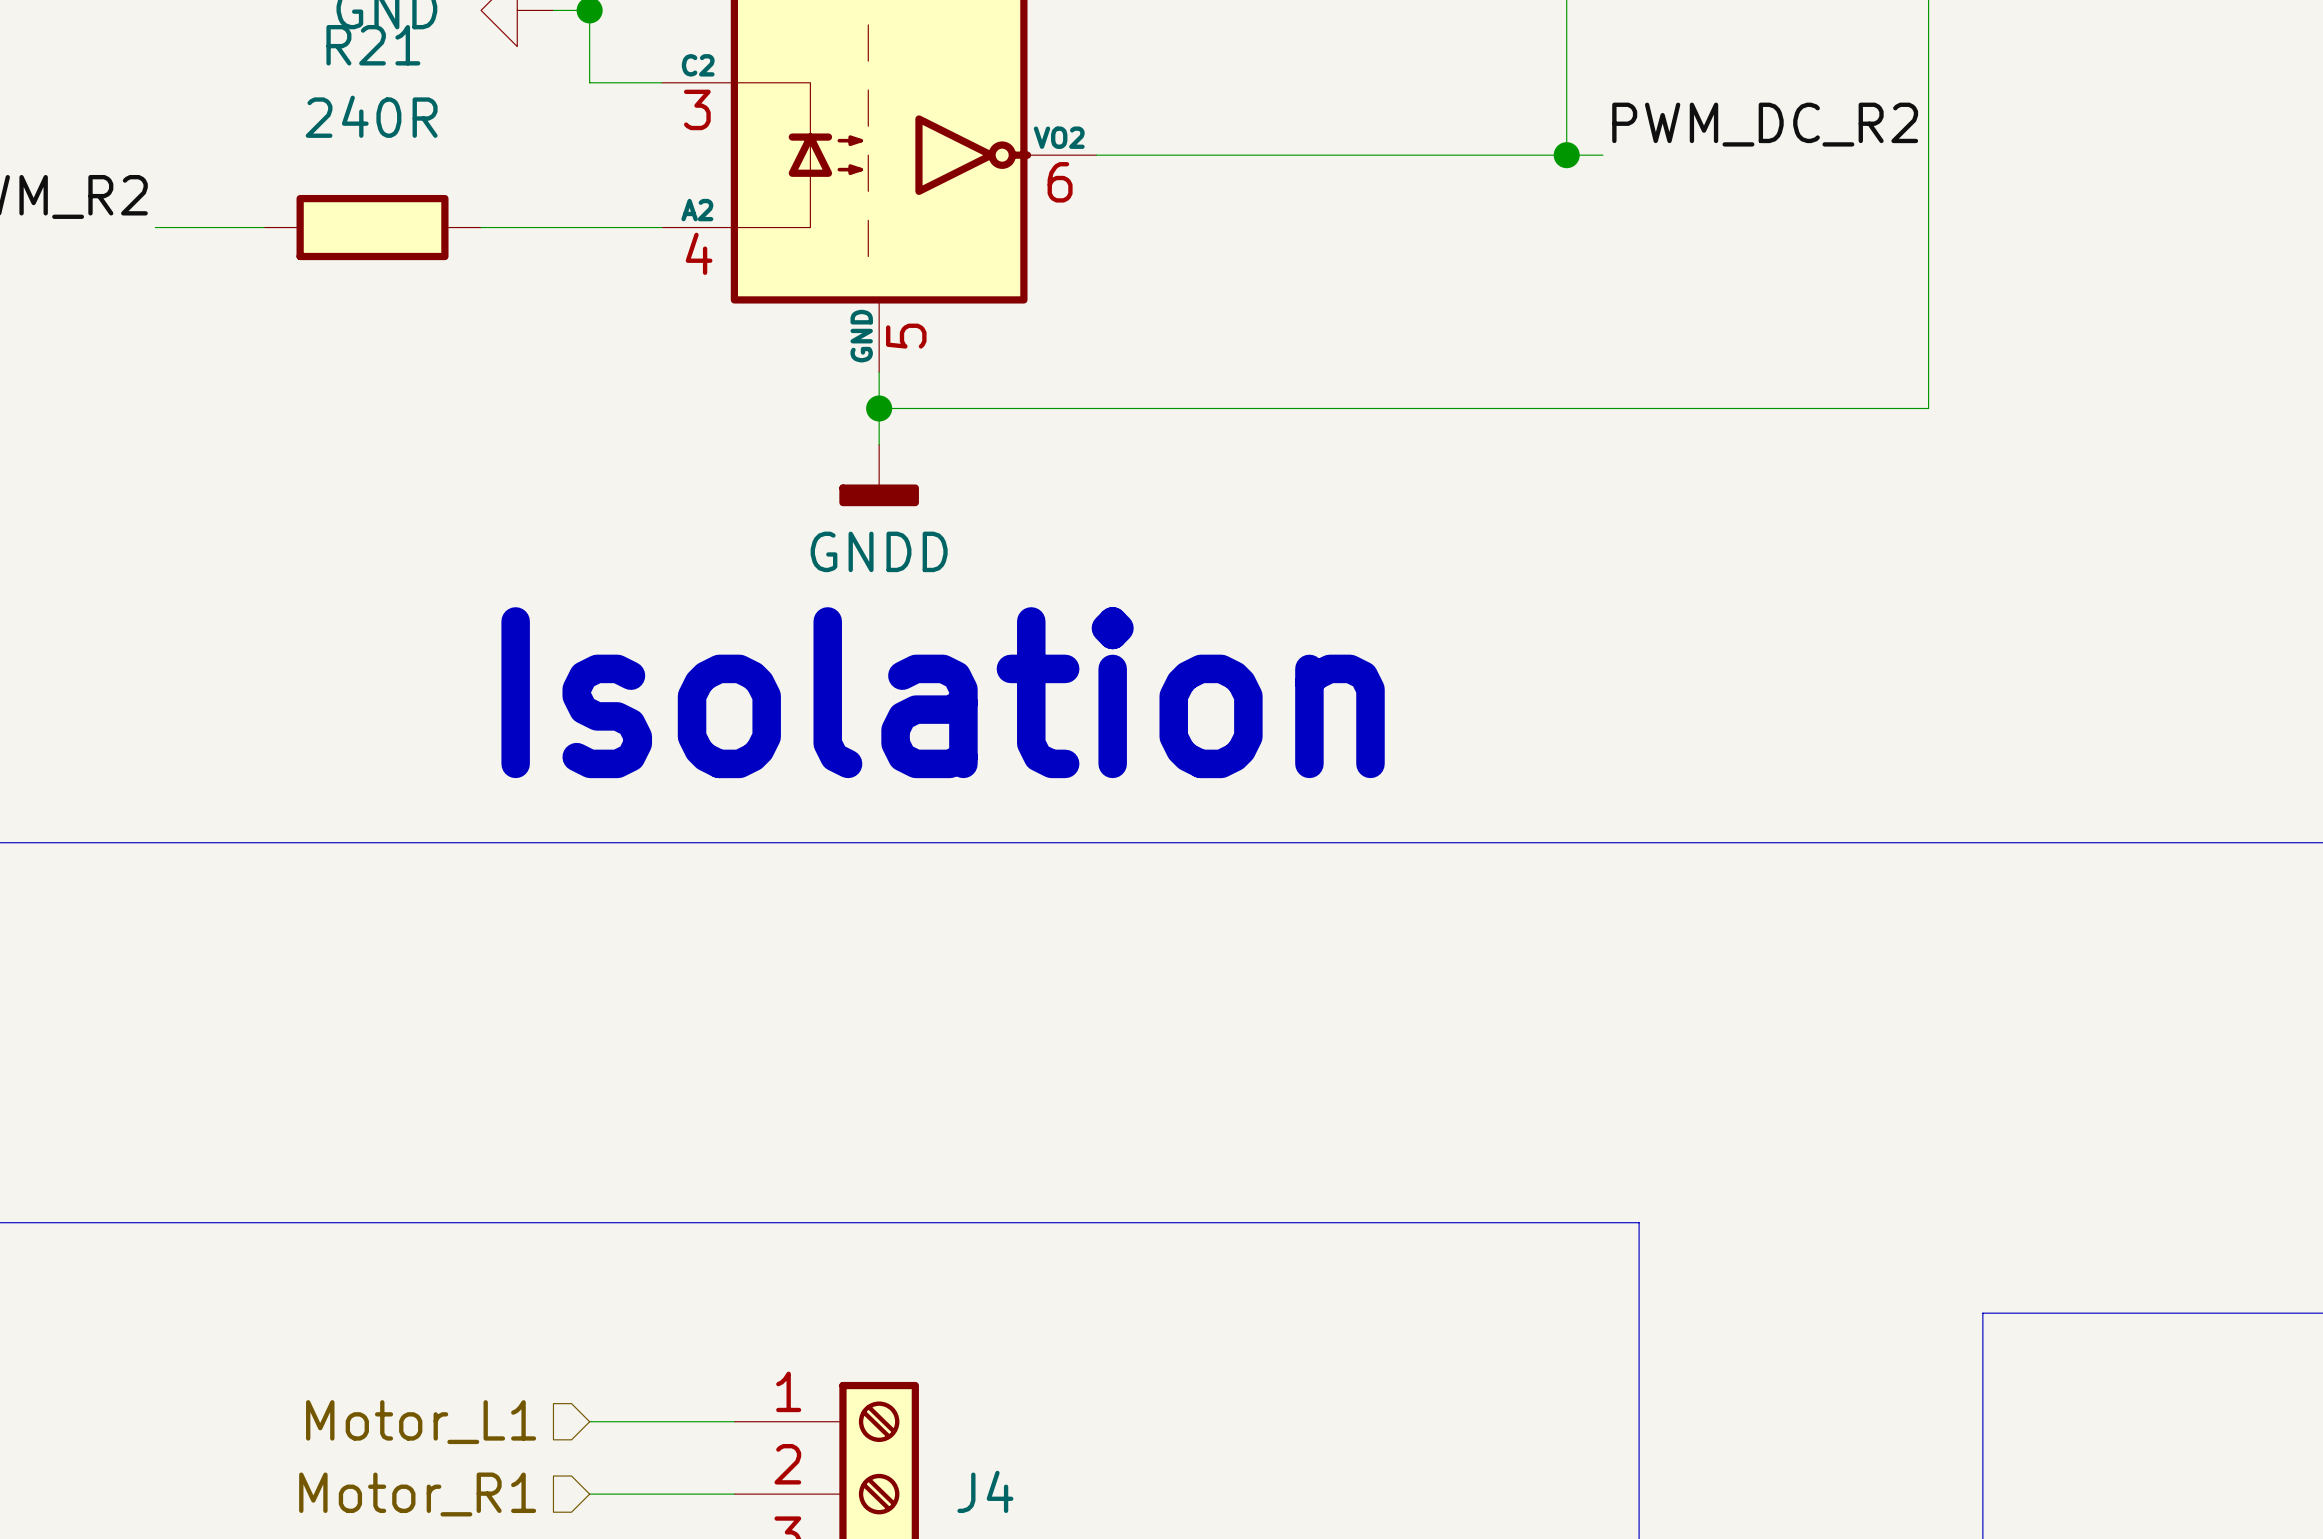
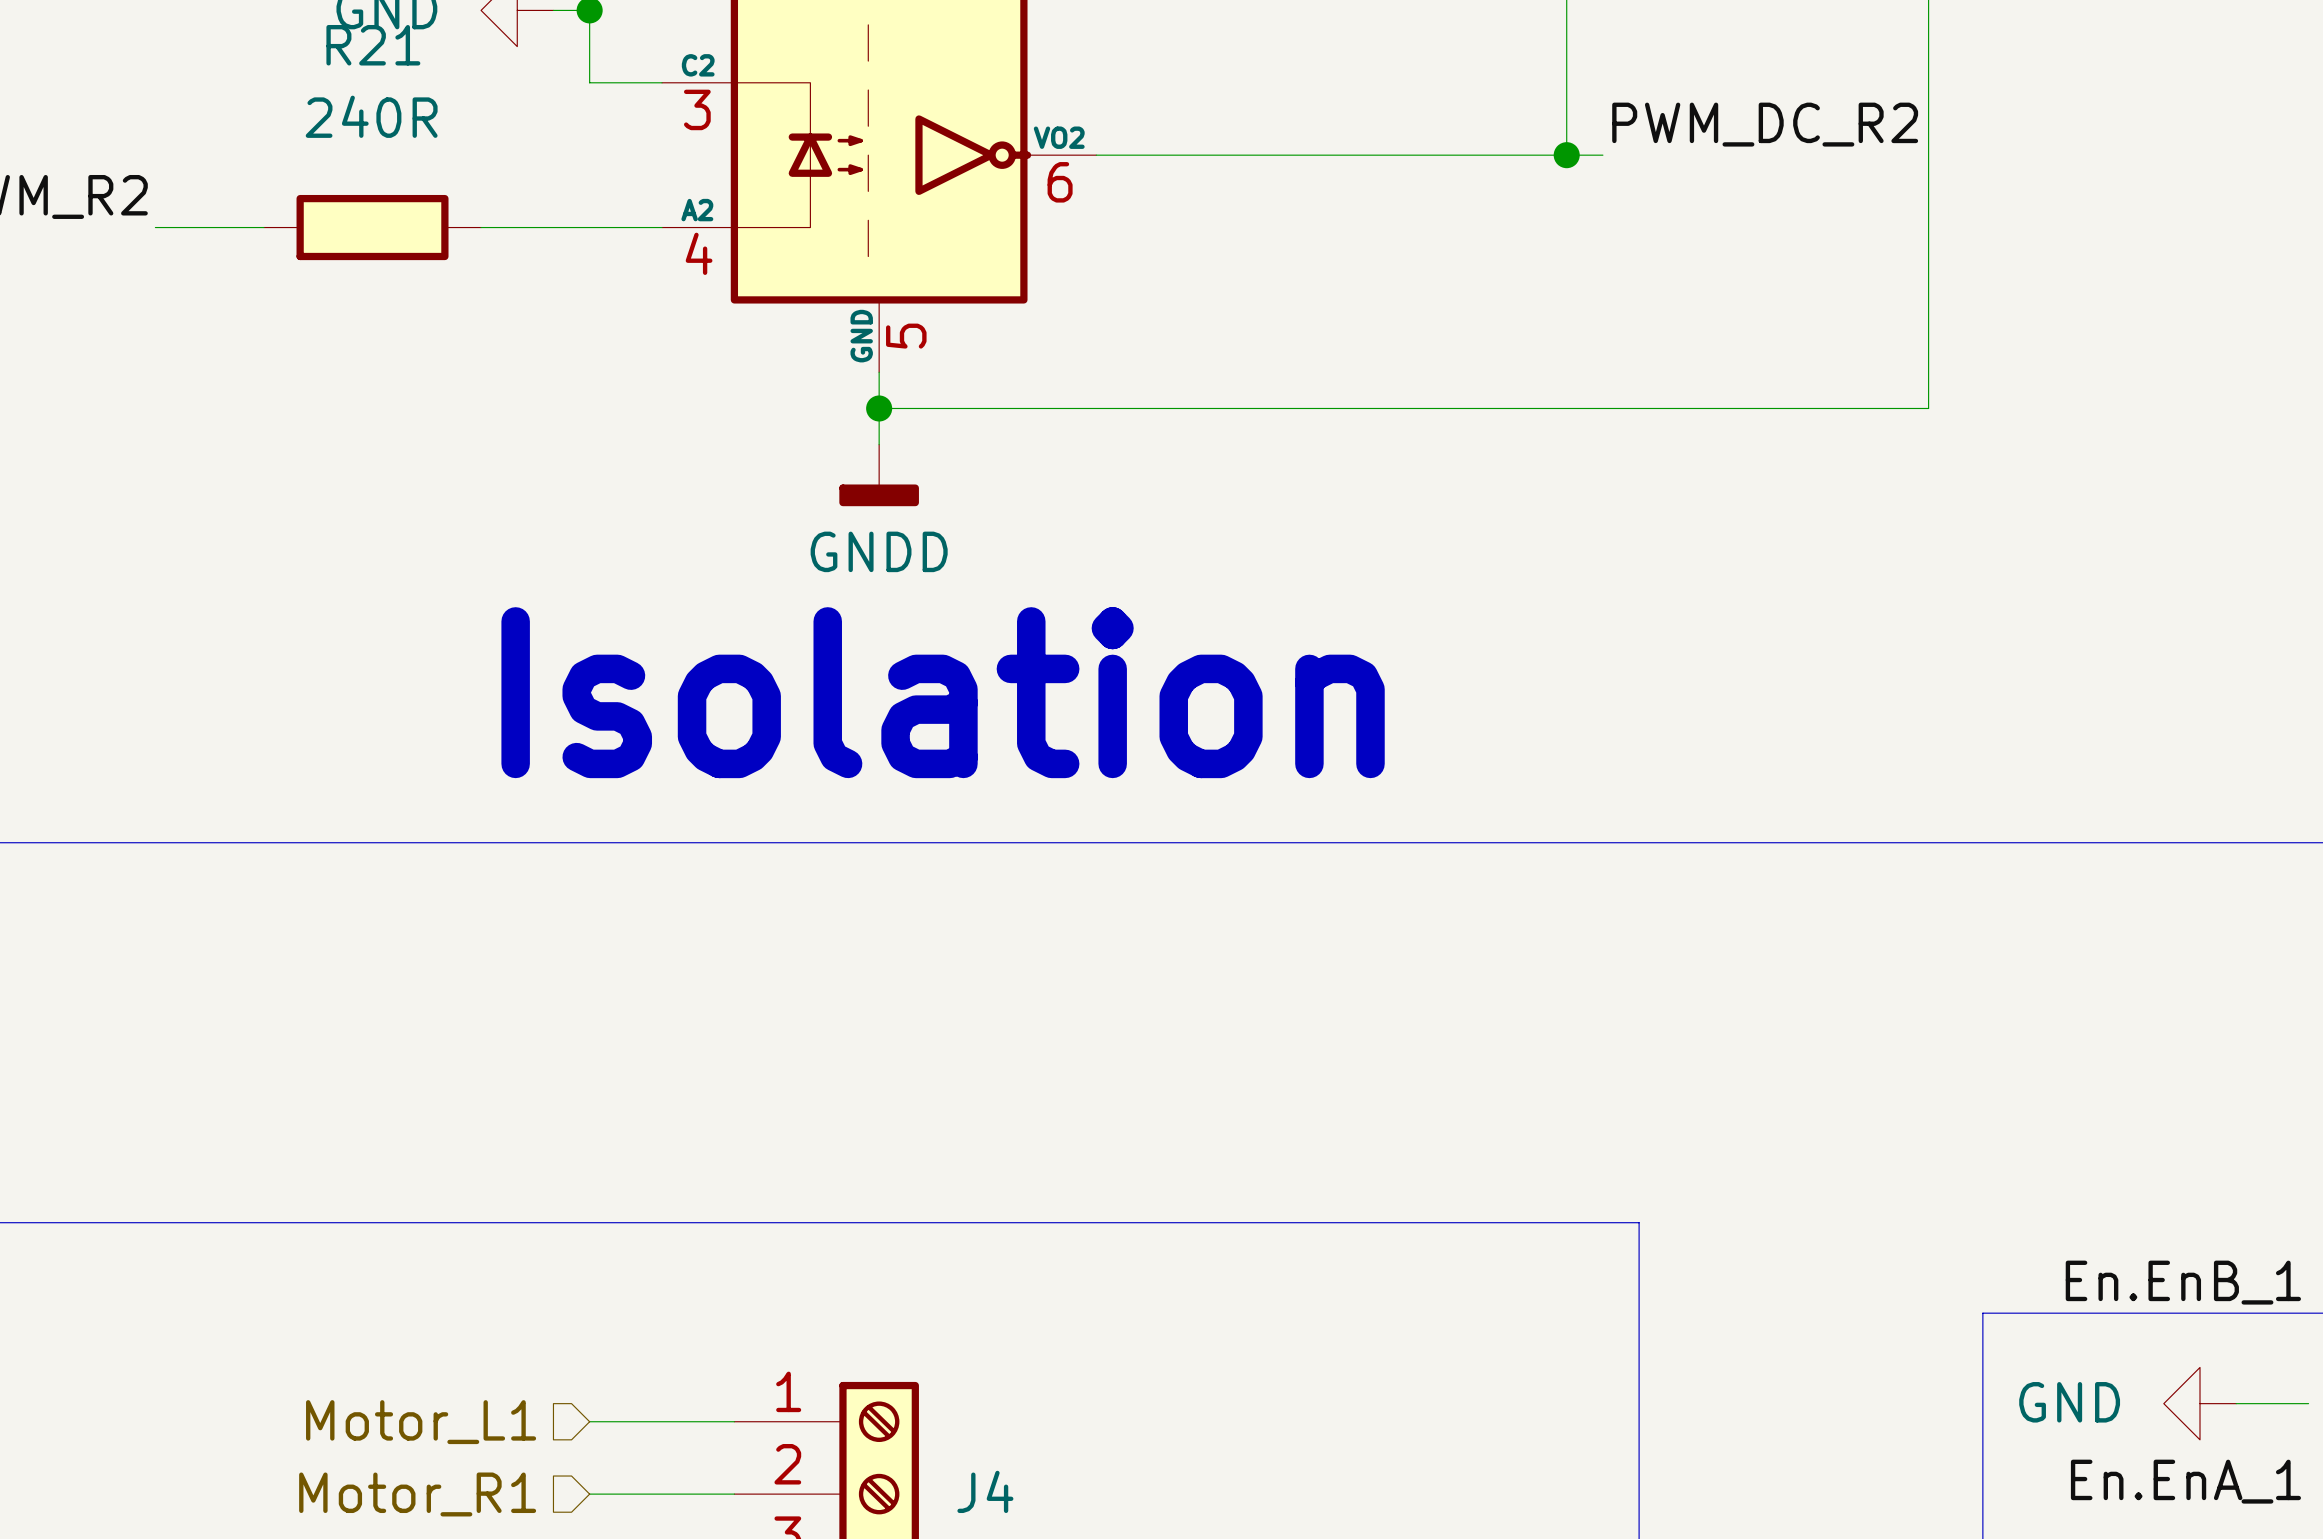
label: none -> En.EnB_1 (2183, 1282)
power symbol: none -> GND (2200, 1403)
wire: none -> (2236, 1403) (2308, 1403)
label: none -> En.EnA_1 (2185, 1481)

